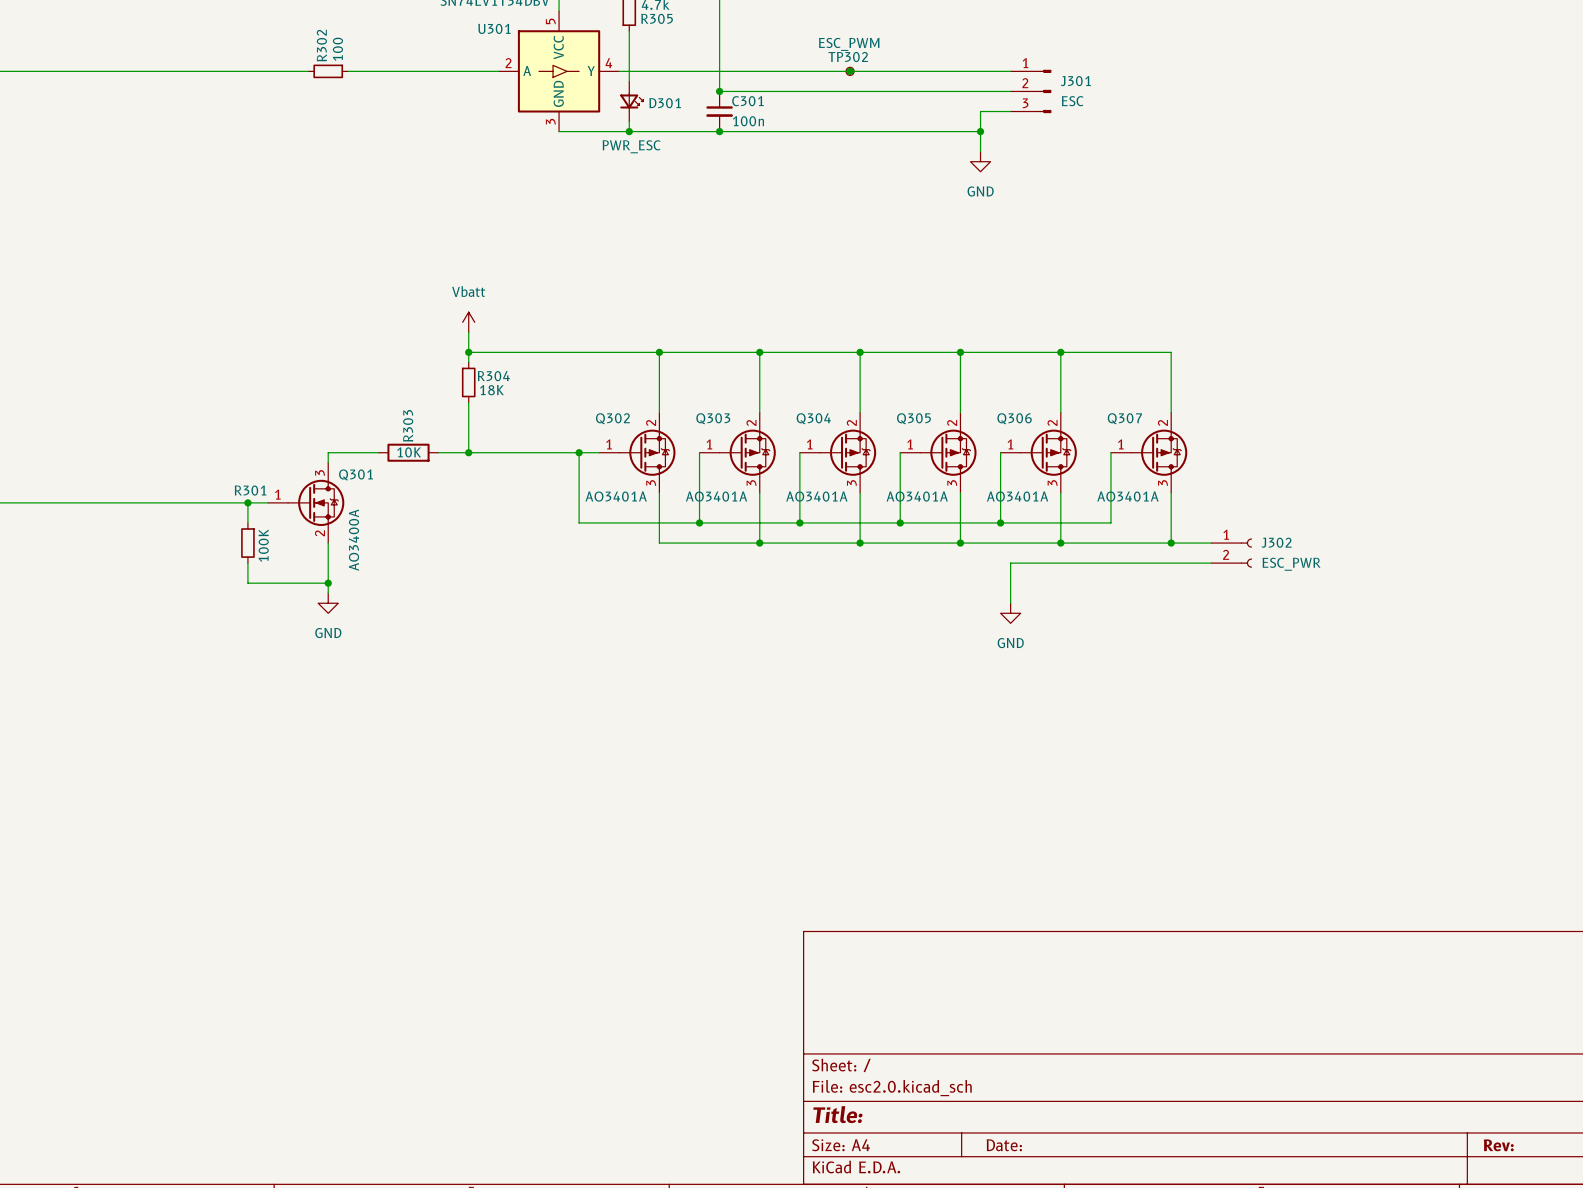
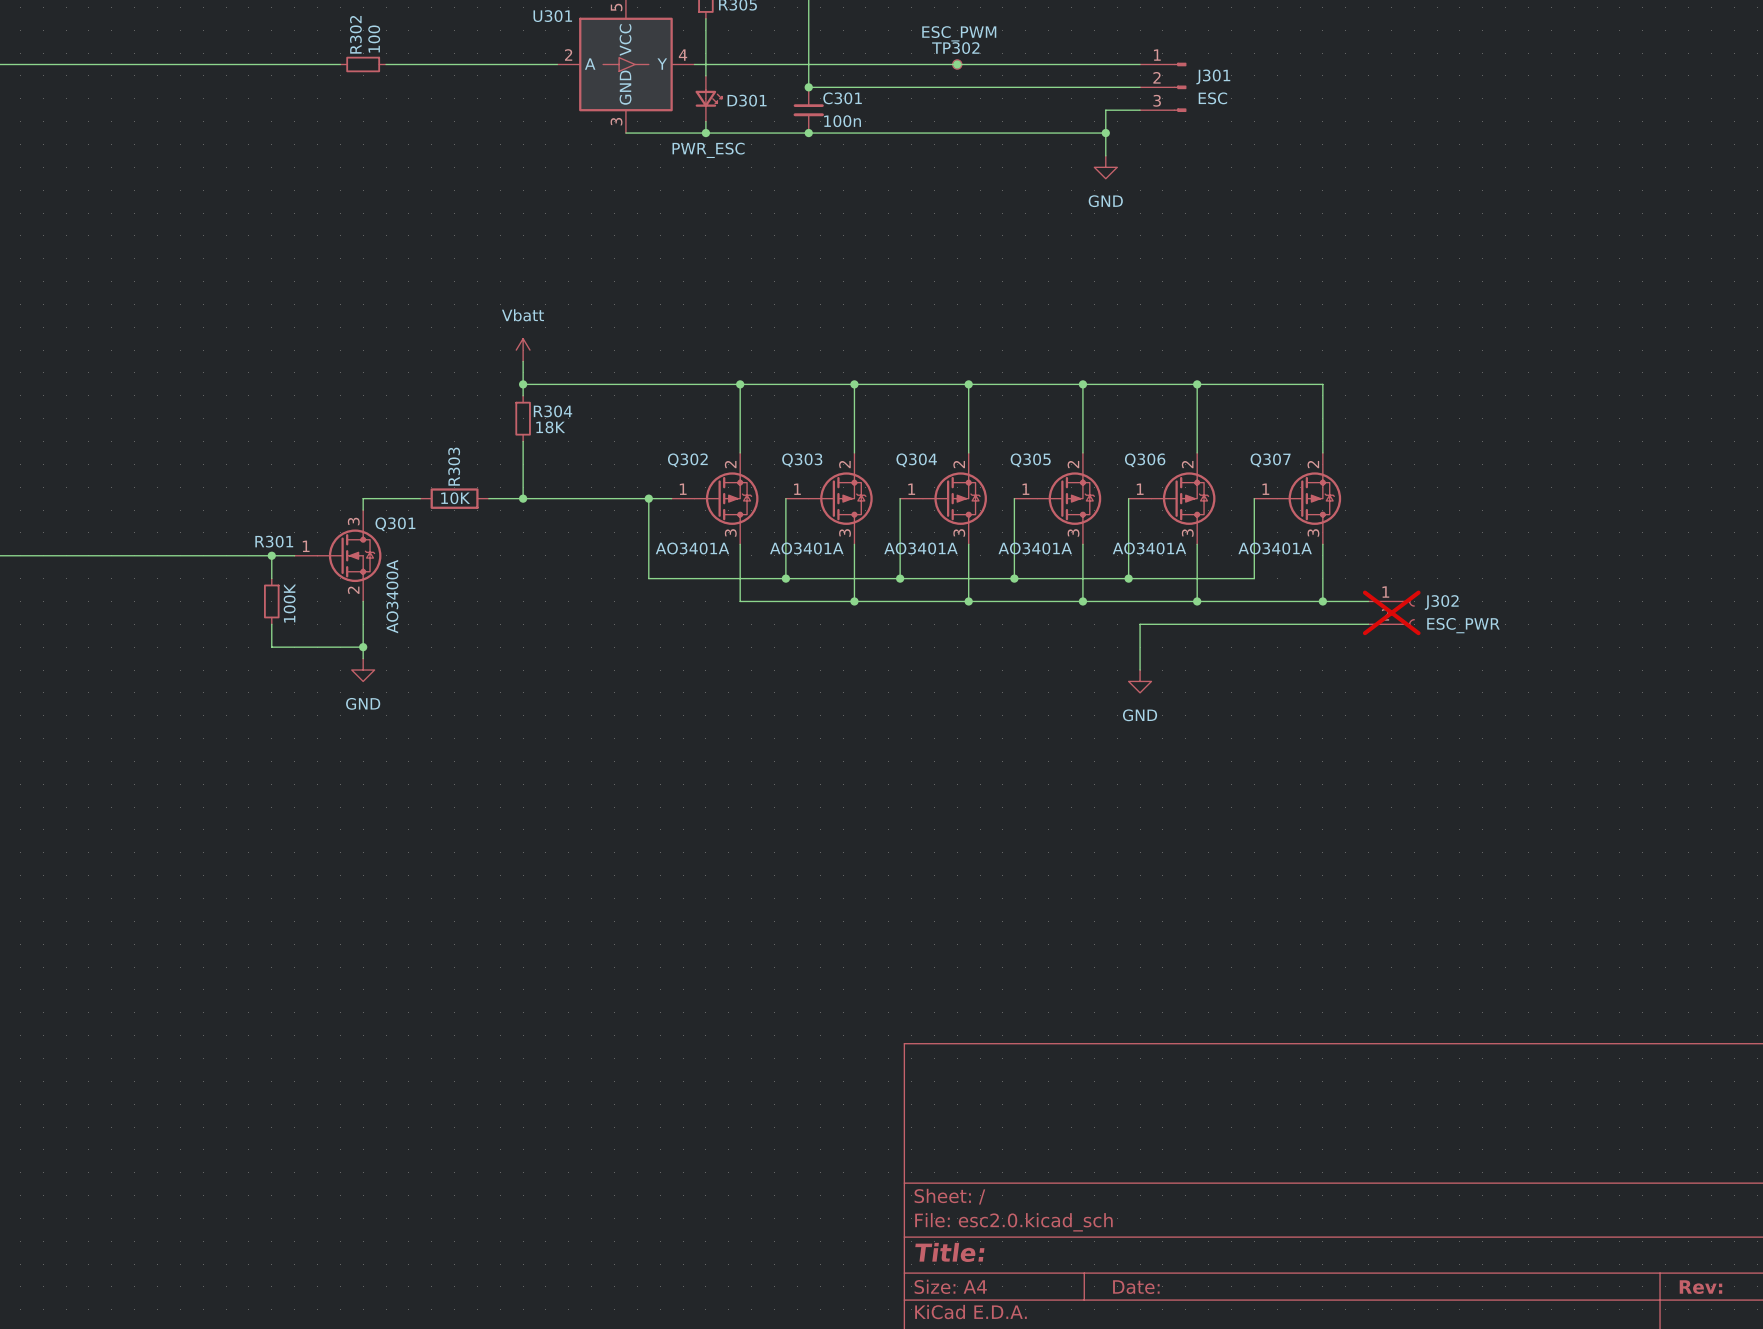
J302 do-not-place cross: none -> (1391, 612)

